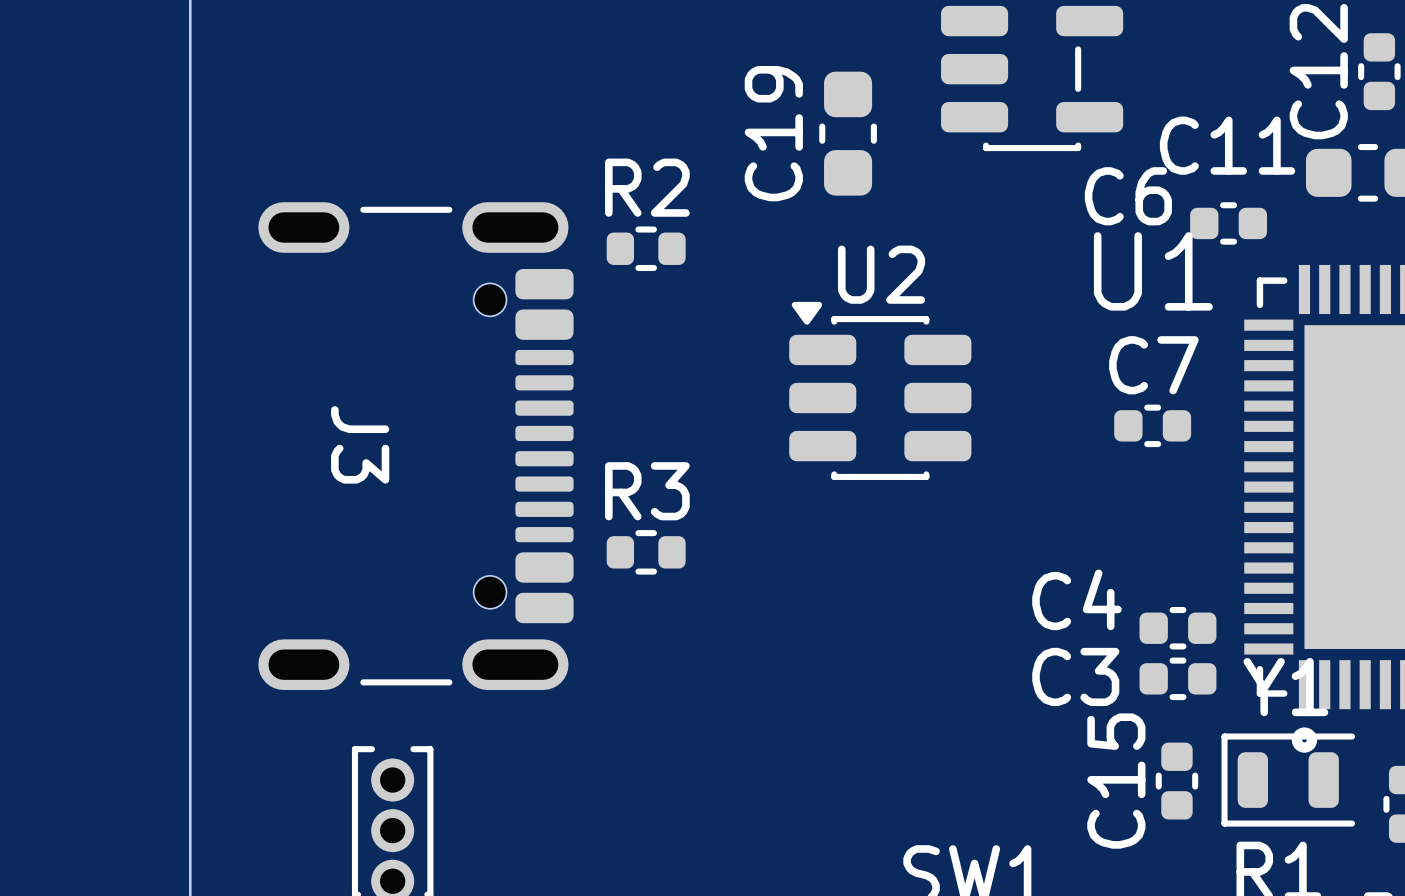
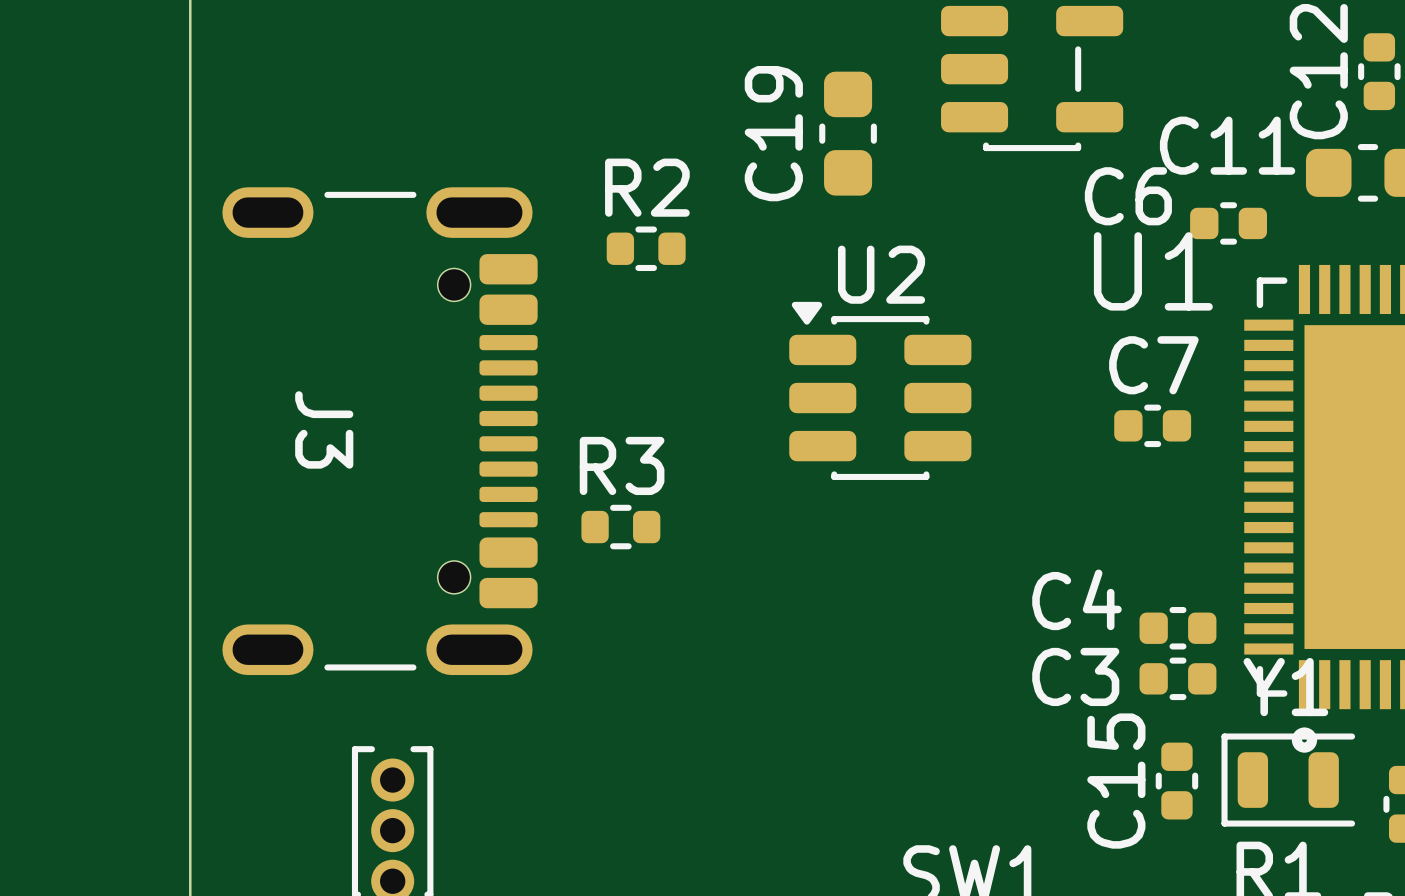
J3 position: (415, 446) -> (380, 431)
R3 position: (646, 552) -> (620, 527)

